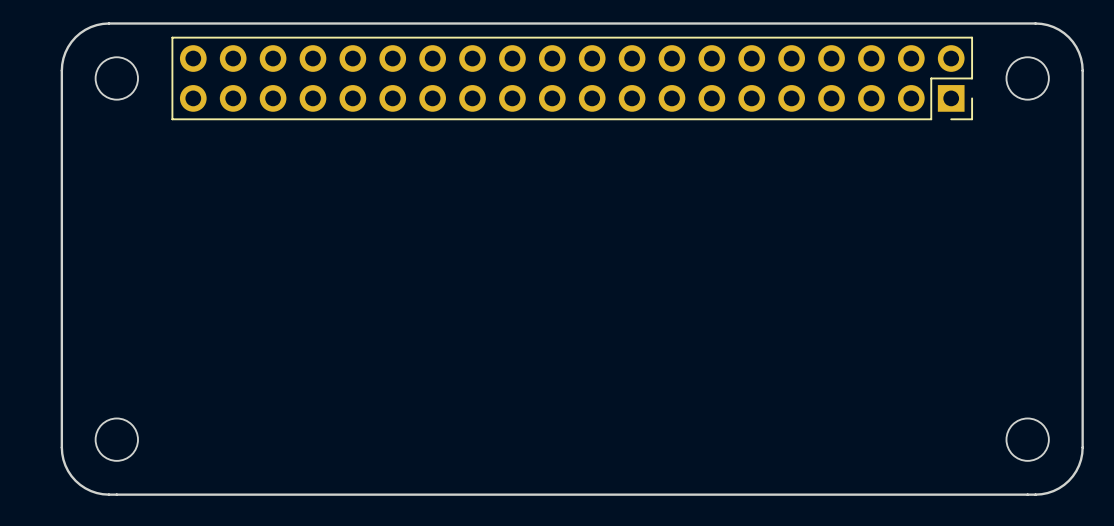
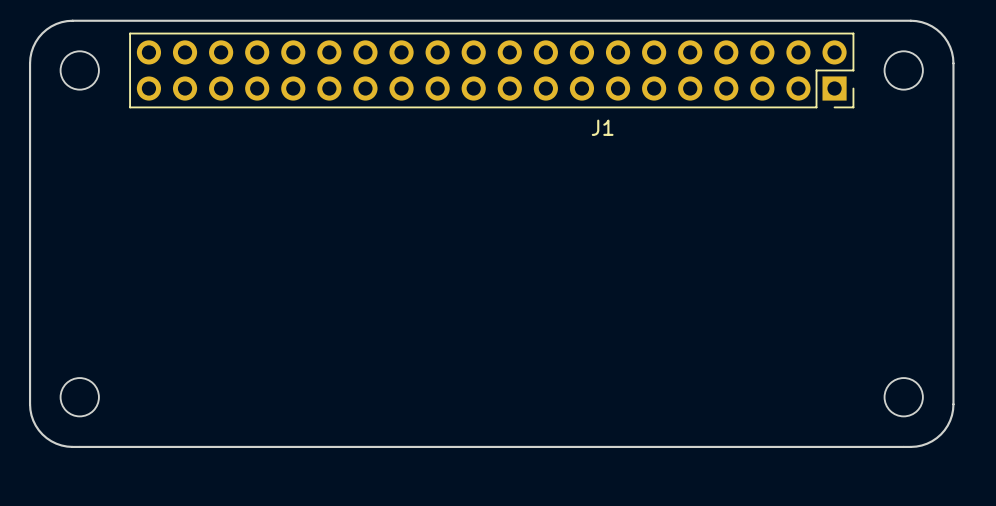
J1 name: none -> J1 (602, 127)

